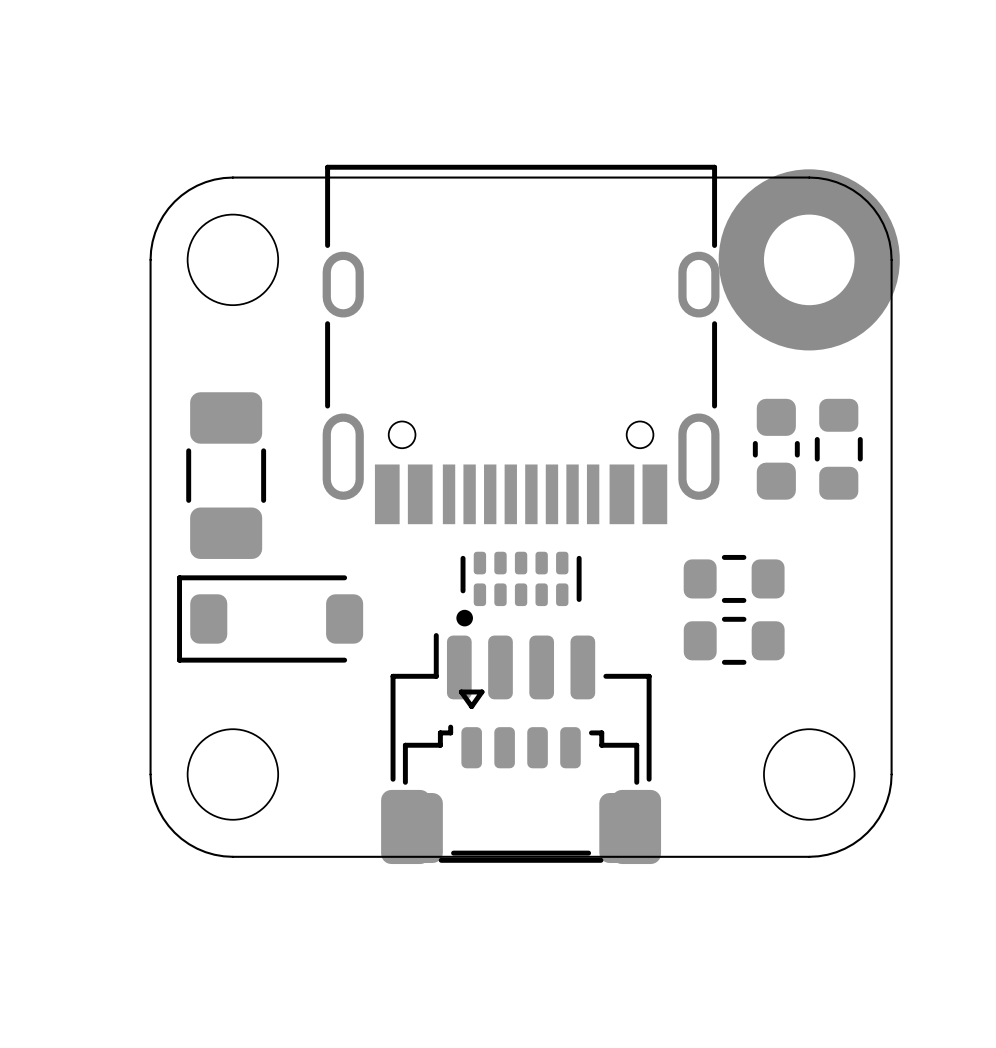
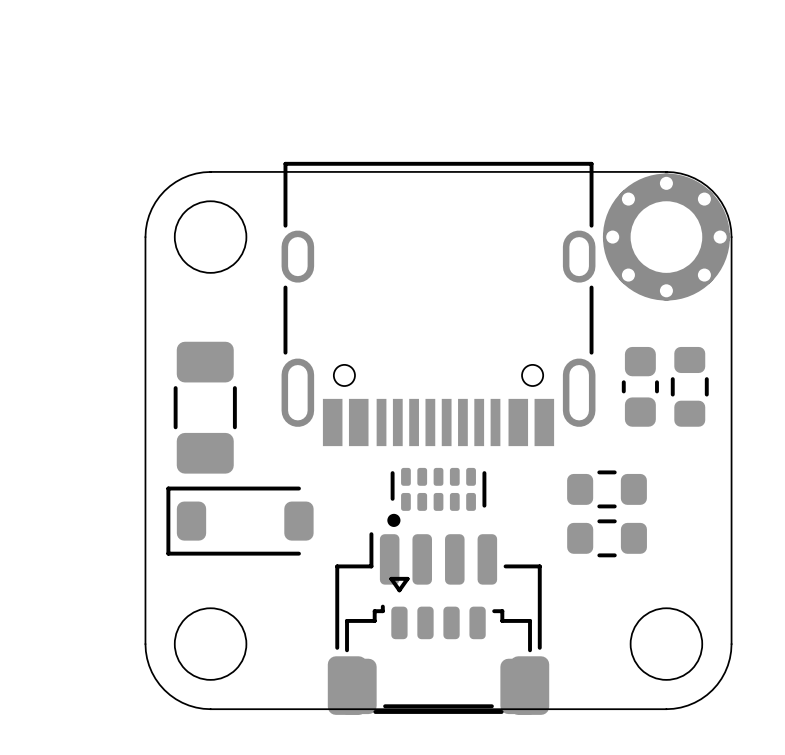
part footprint: [718, 169, 900, 351] -> [602, 173, 730, 301]

